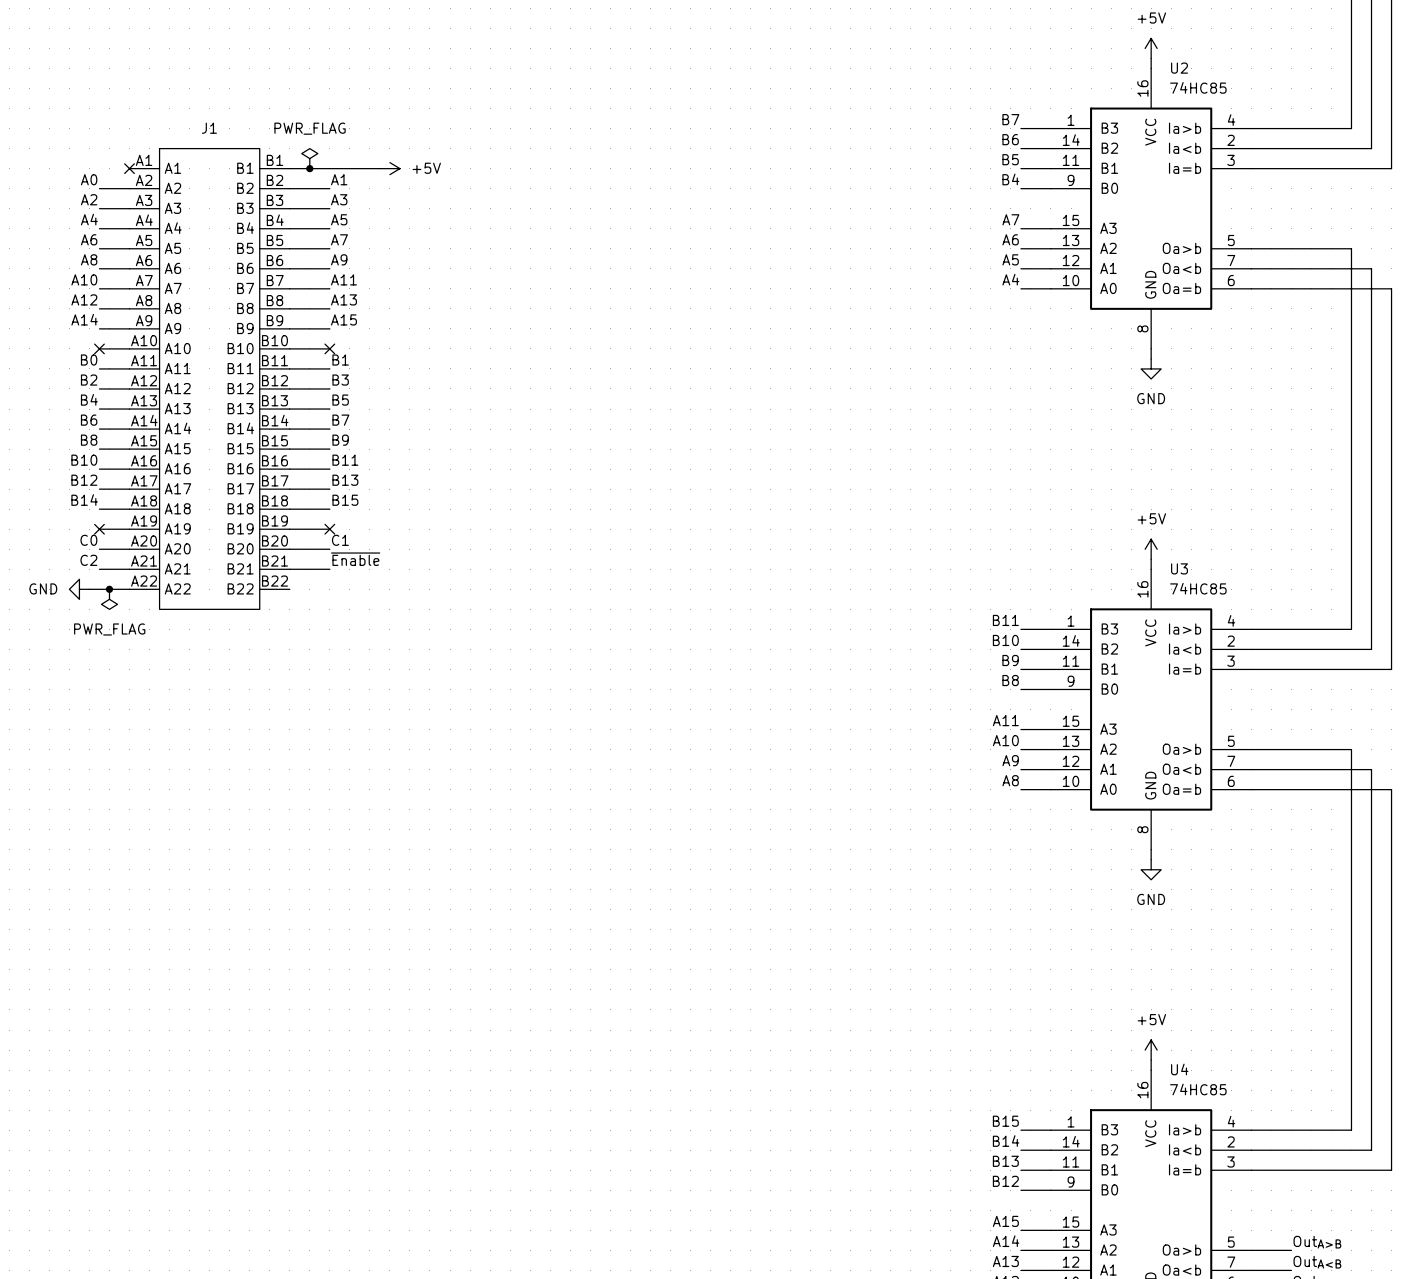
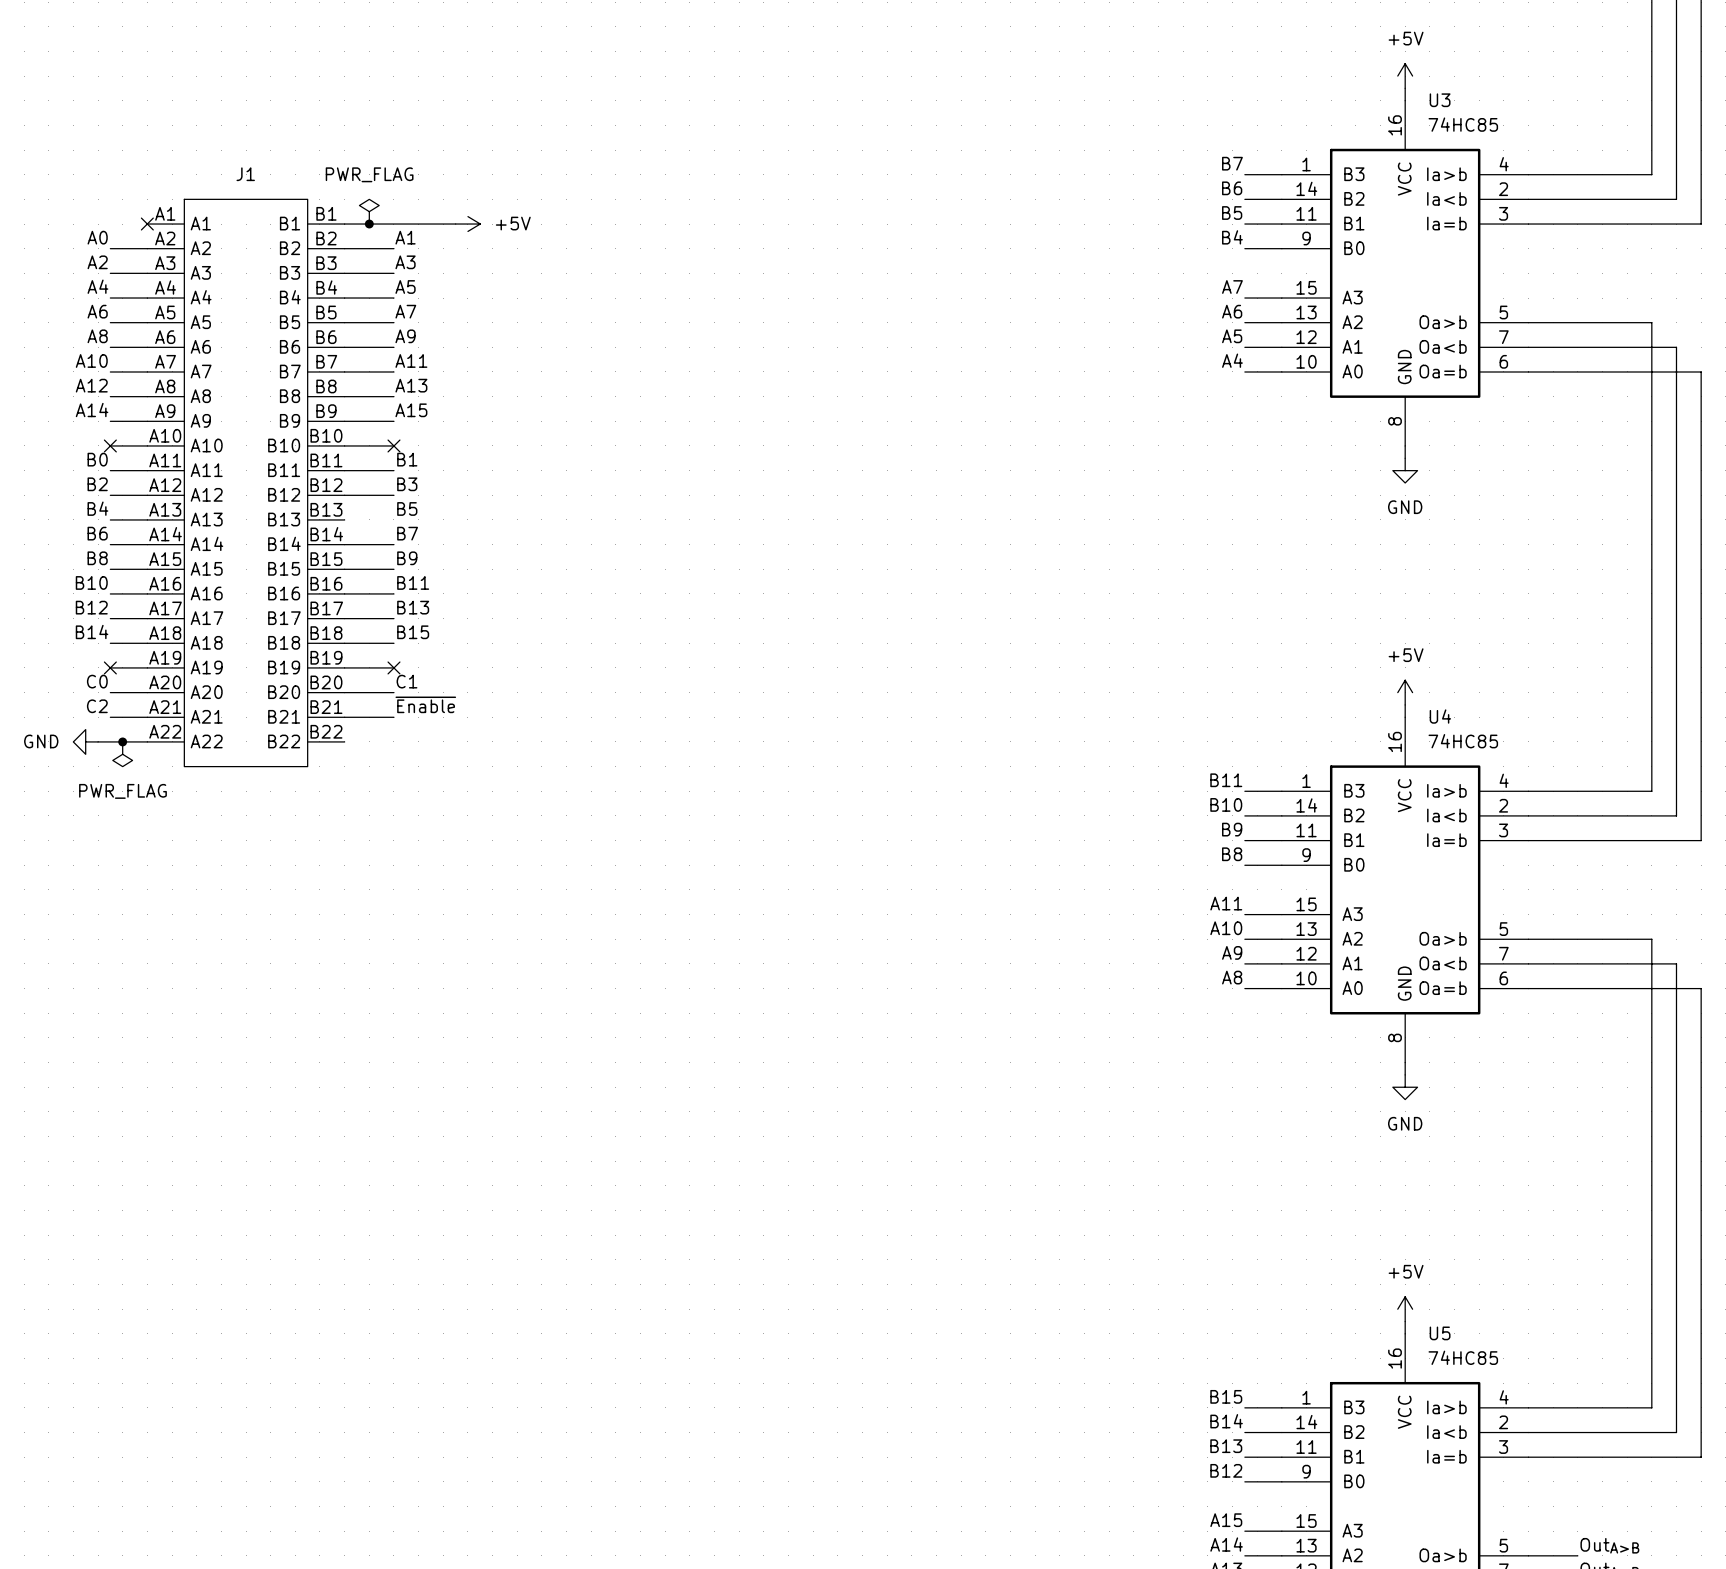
U2 name: U2 (1179, 68) -> U3 (1440, 100)
wire: (289, 409) (329, 409) -> none
U3 name: U3 (1179, 568) -> U4 (1440, 716)
U4 name: U4 (1179, 1069) -> U5 (1440, 1333)

